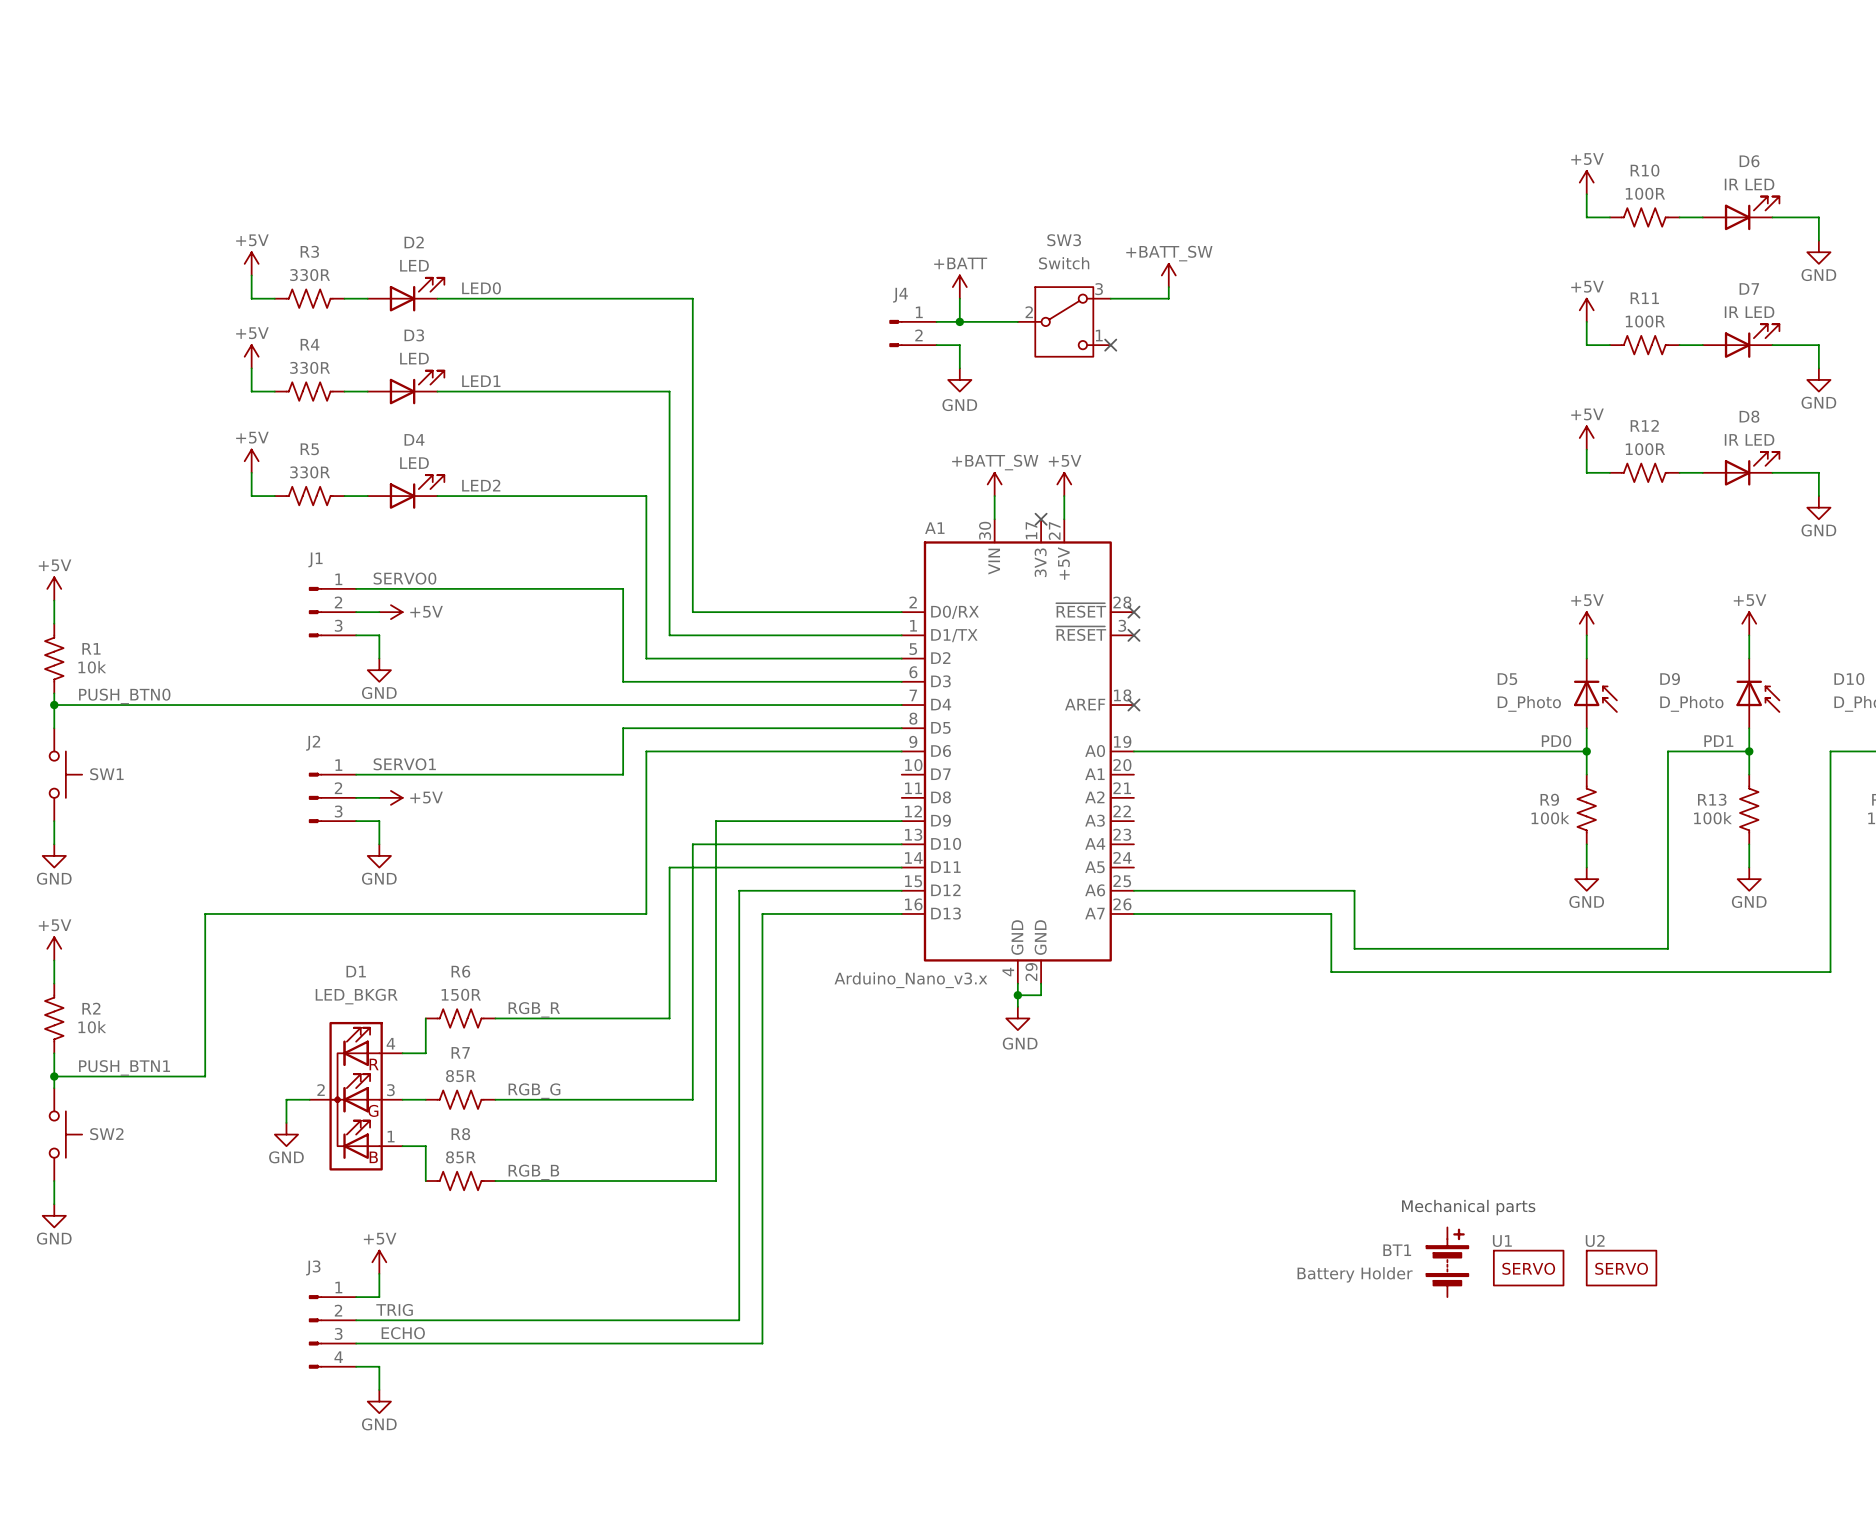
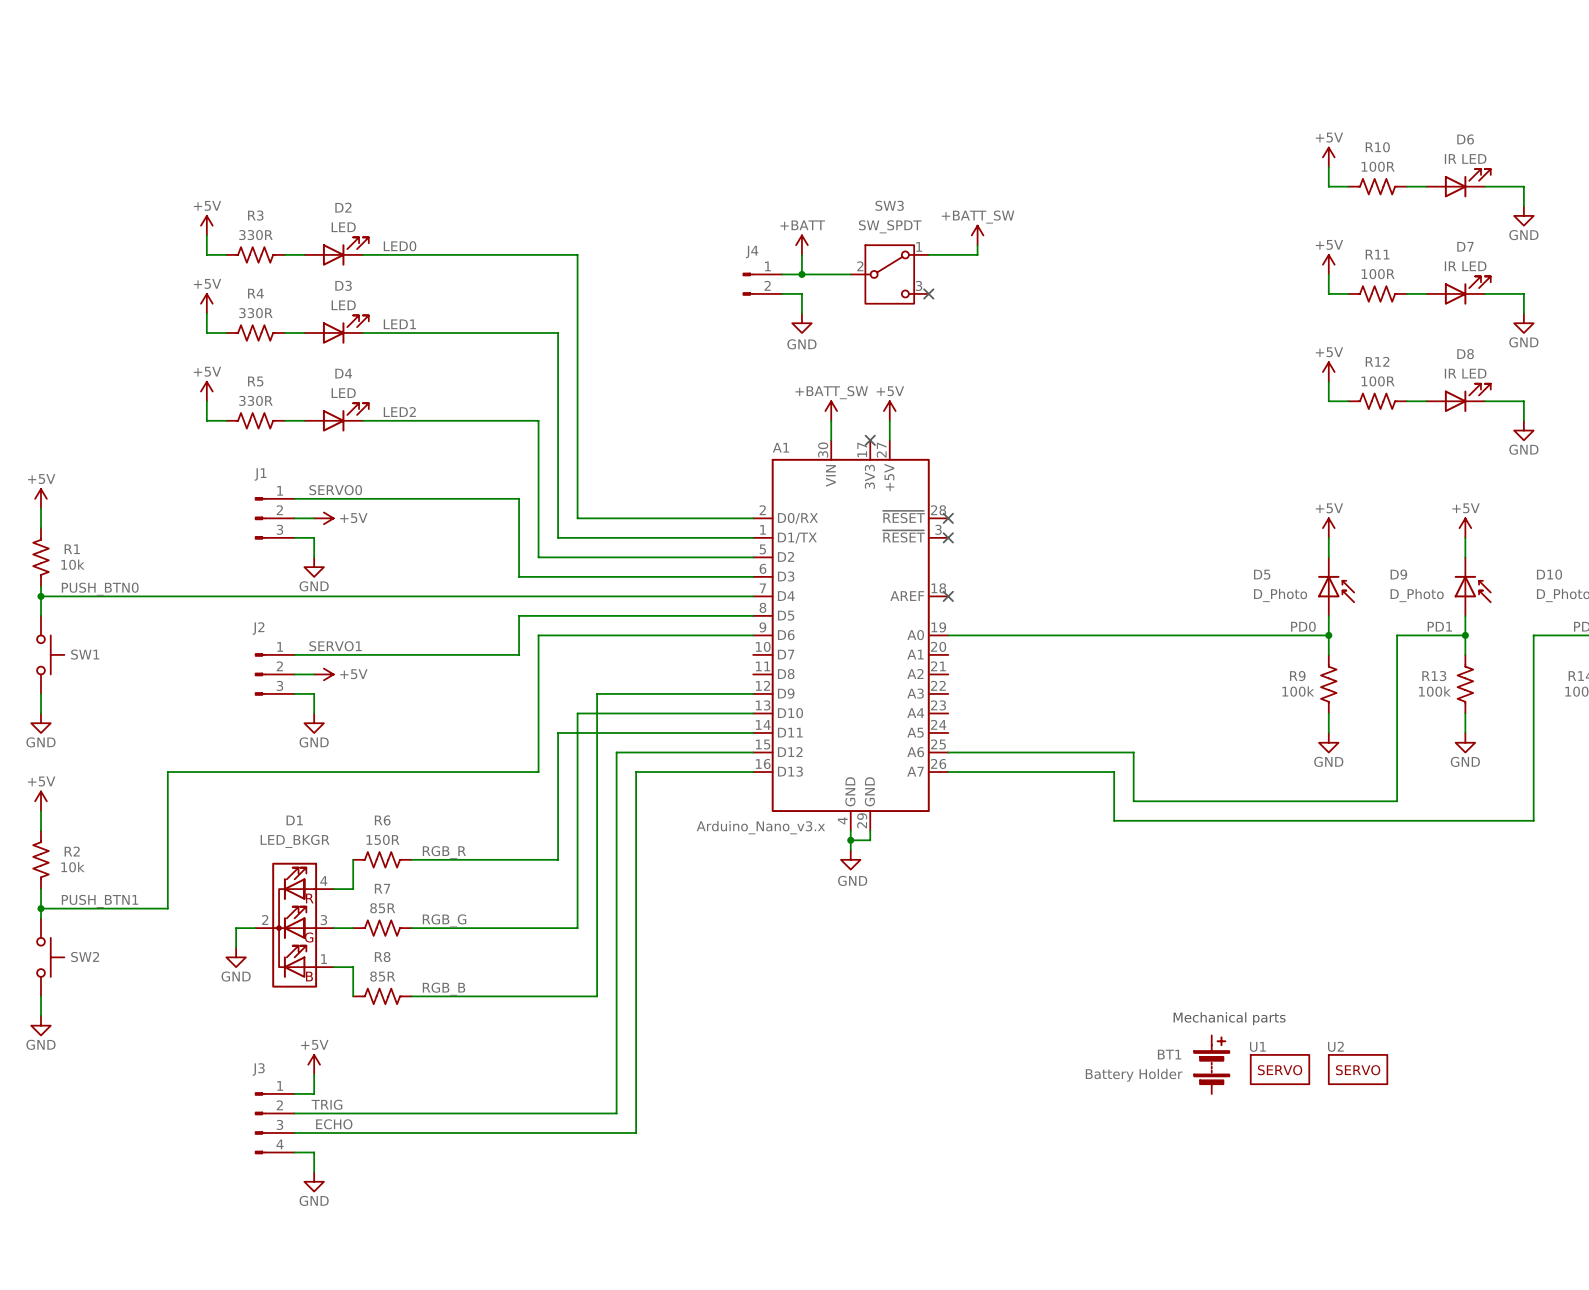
SW3 value: Switch (1064, 263) -> SW_SPDT (890, 226)
SW3 pin number: 3 (1099, 289) -> 1 (919, 246)
SW3 pin number: 1 (1099, 335) -> 3 (919, 285)

